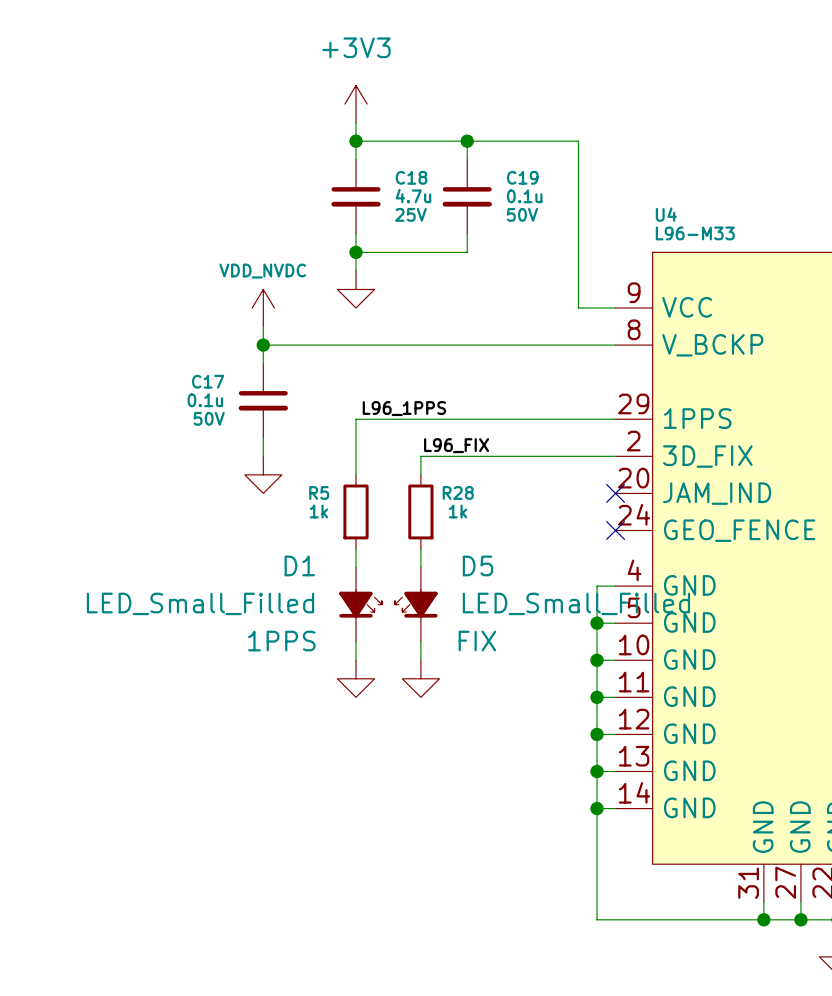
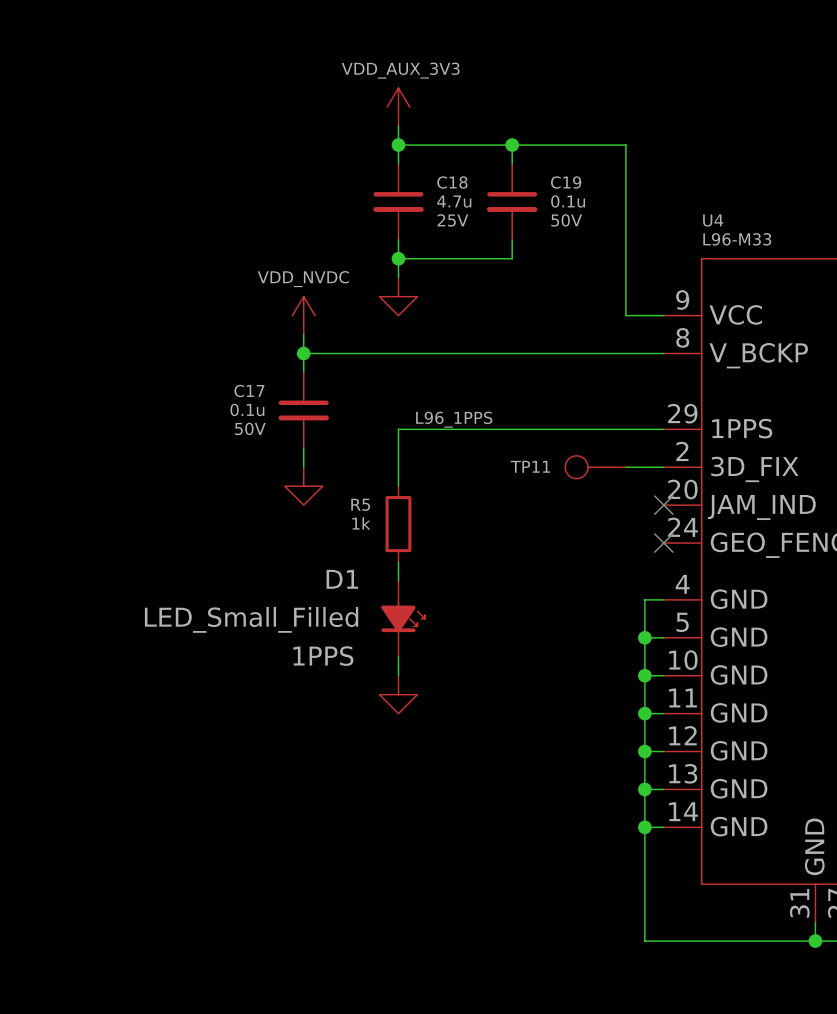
power symbol: +3V3 (356, 104) -> VDD_AUX_3V3 (398, 107)
label: L96_FIX (456, 445) -> none
TP11: none -> (595, 467)
wire: (578, 456) (420, 456) (420, 474) -> none
R28: 1k (420, 511) -> none
wire: (420, 549) (420, 567) -> none
D5: LED_Small_Filled (416, 604) -> none
wire: (420, 641) (420, 660) -> none
power symbol: (420, 678) -> none

